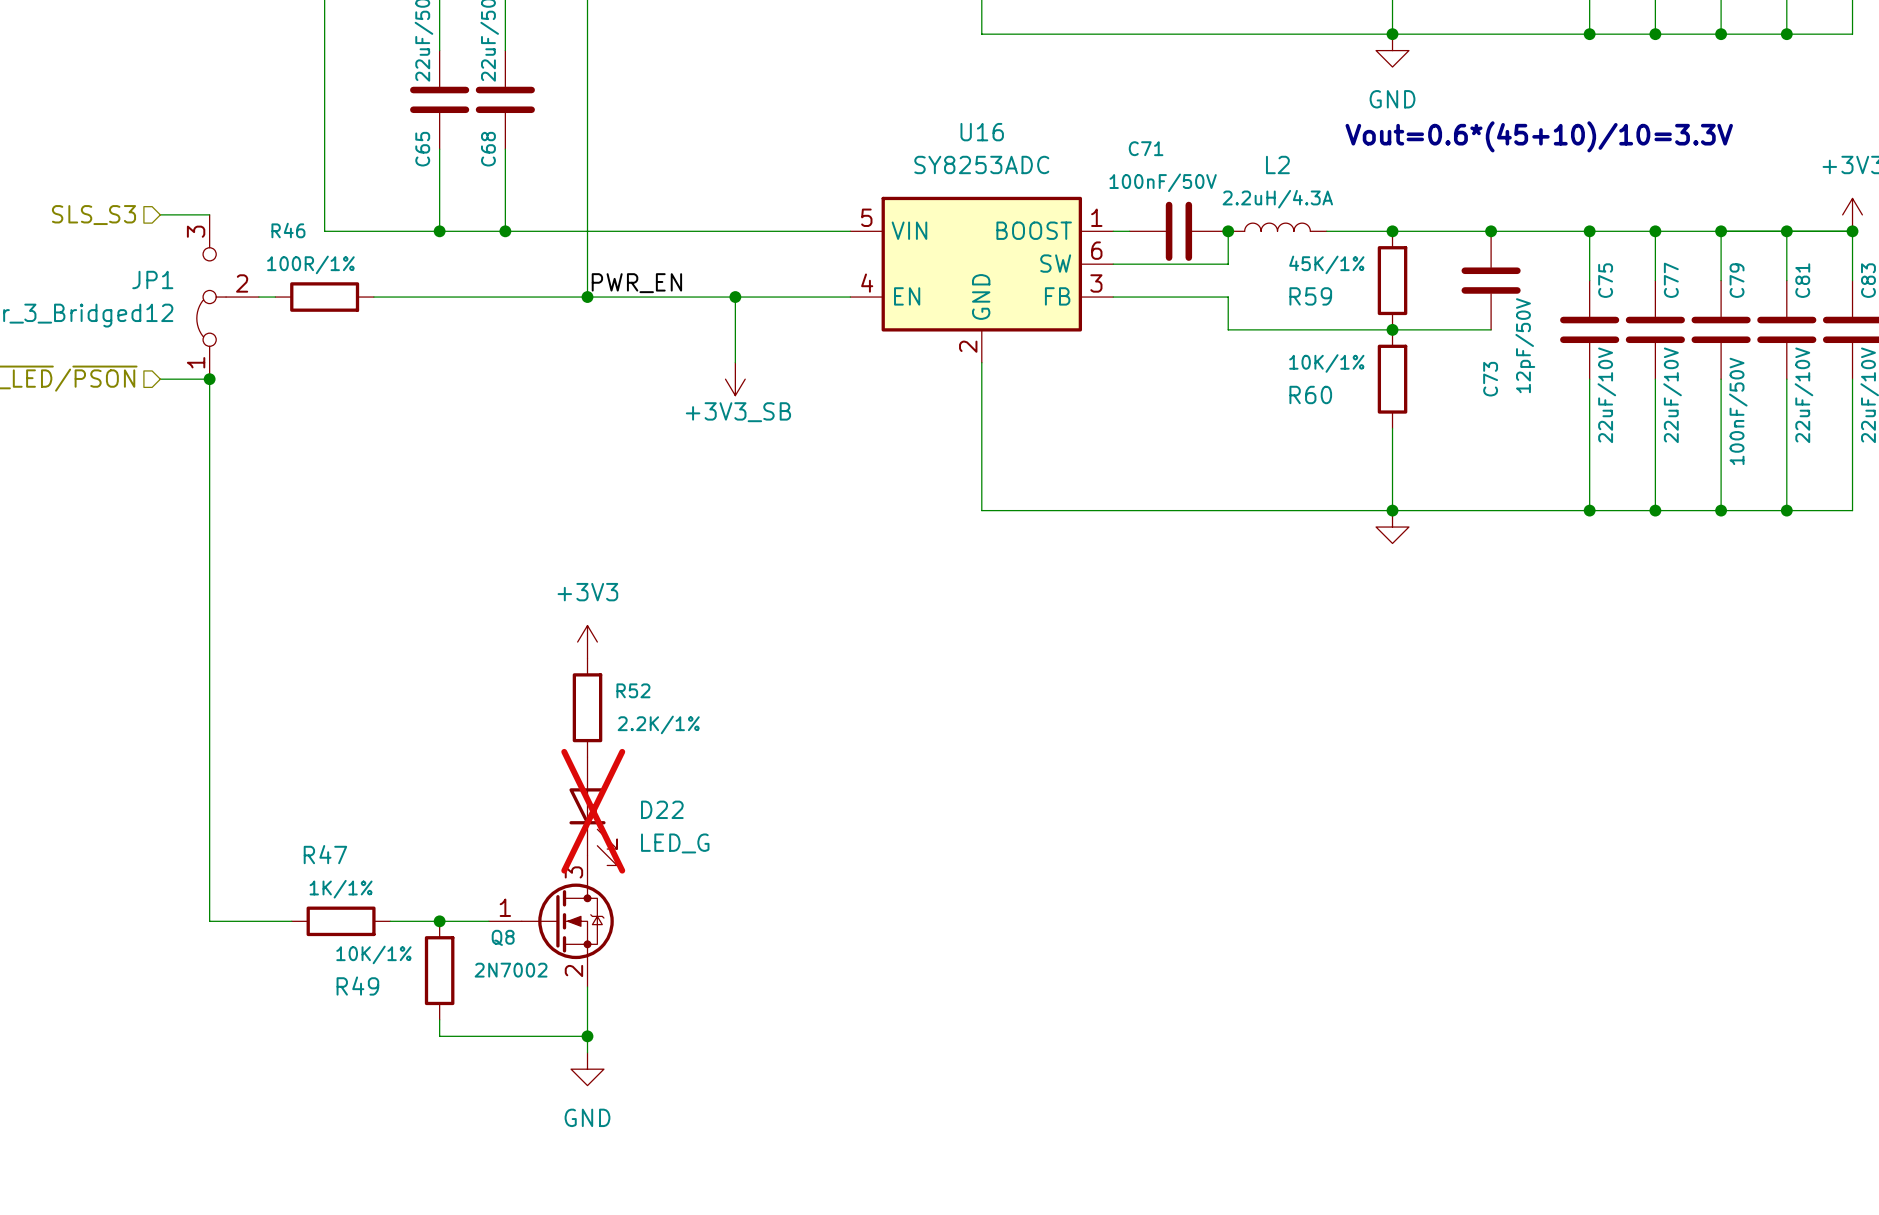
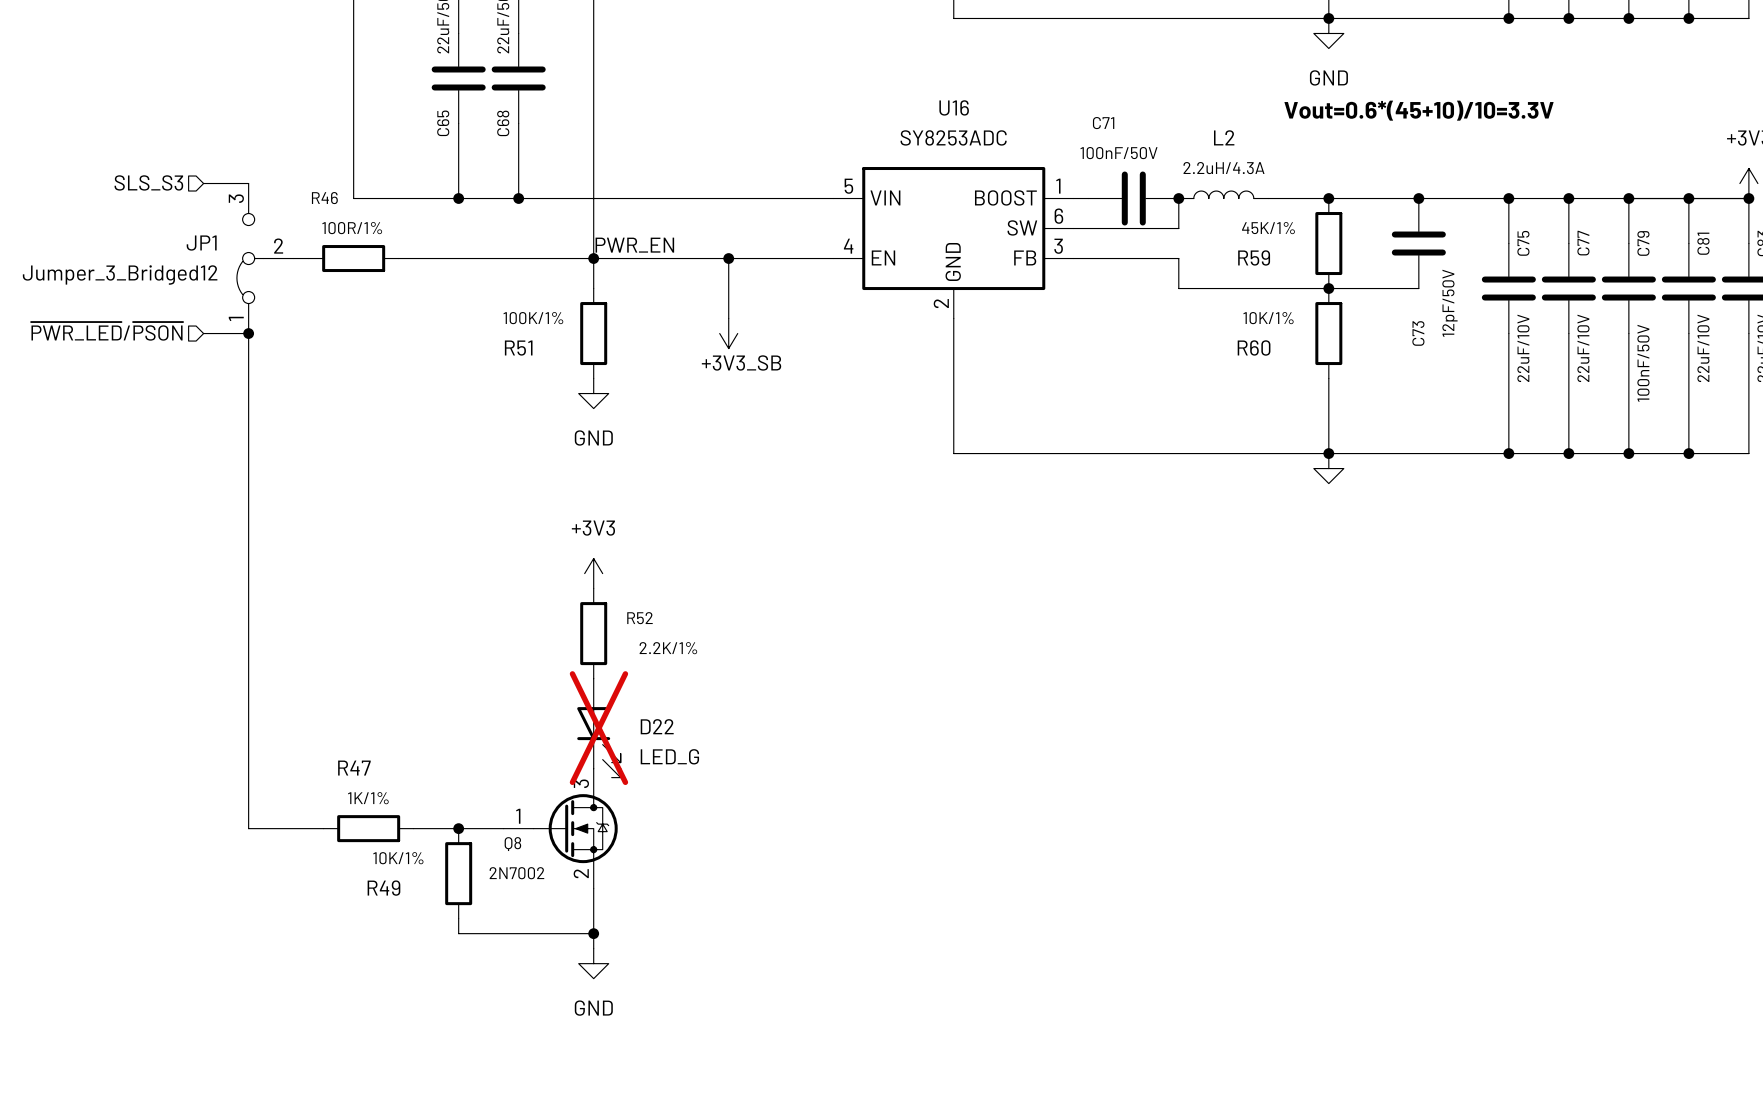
wire: none -> (593, 258) (593, 288)
R51: none -> 100K/1% (593, 333)
power symbol: none -> GND (593, 393)

